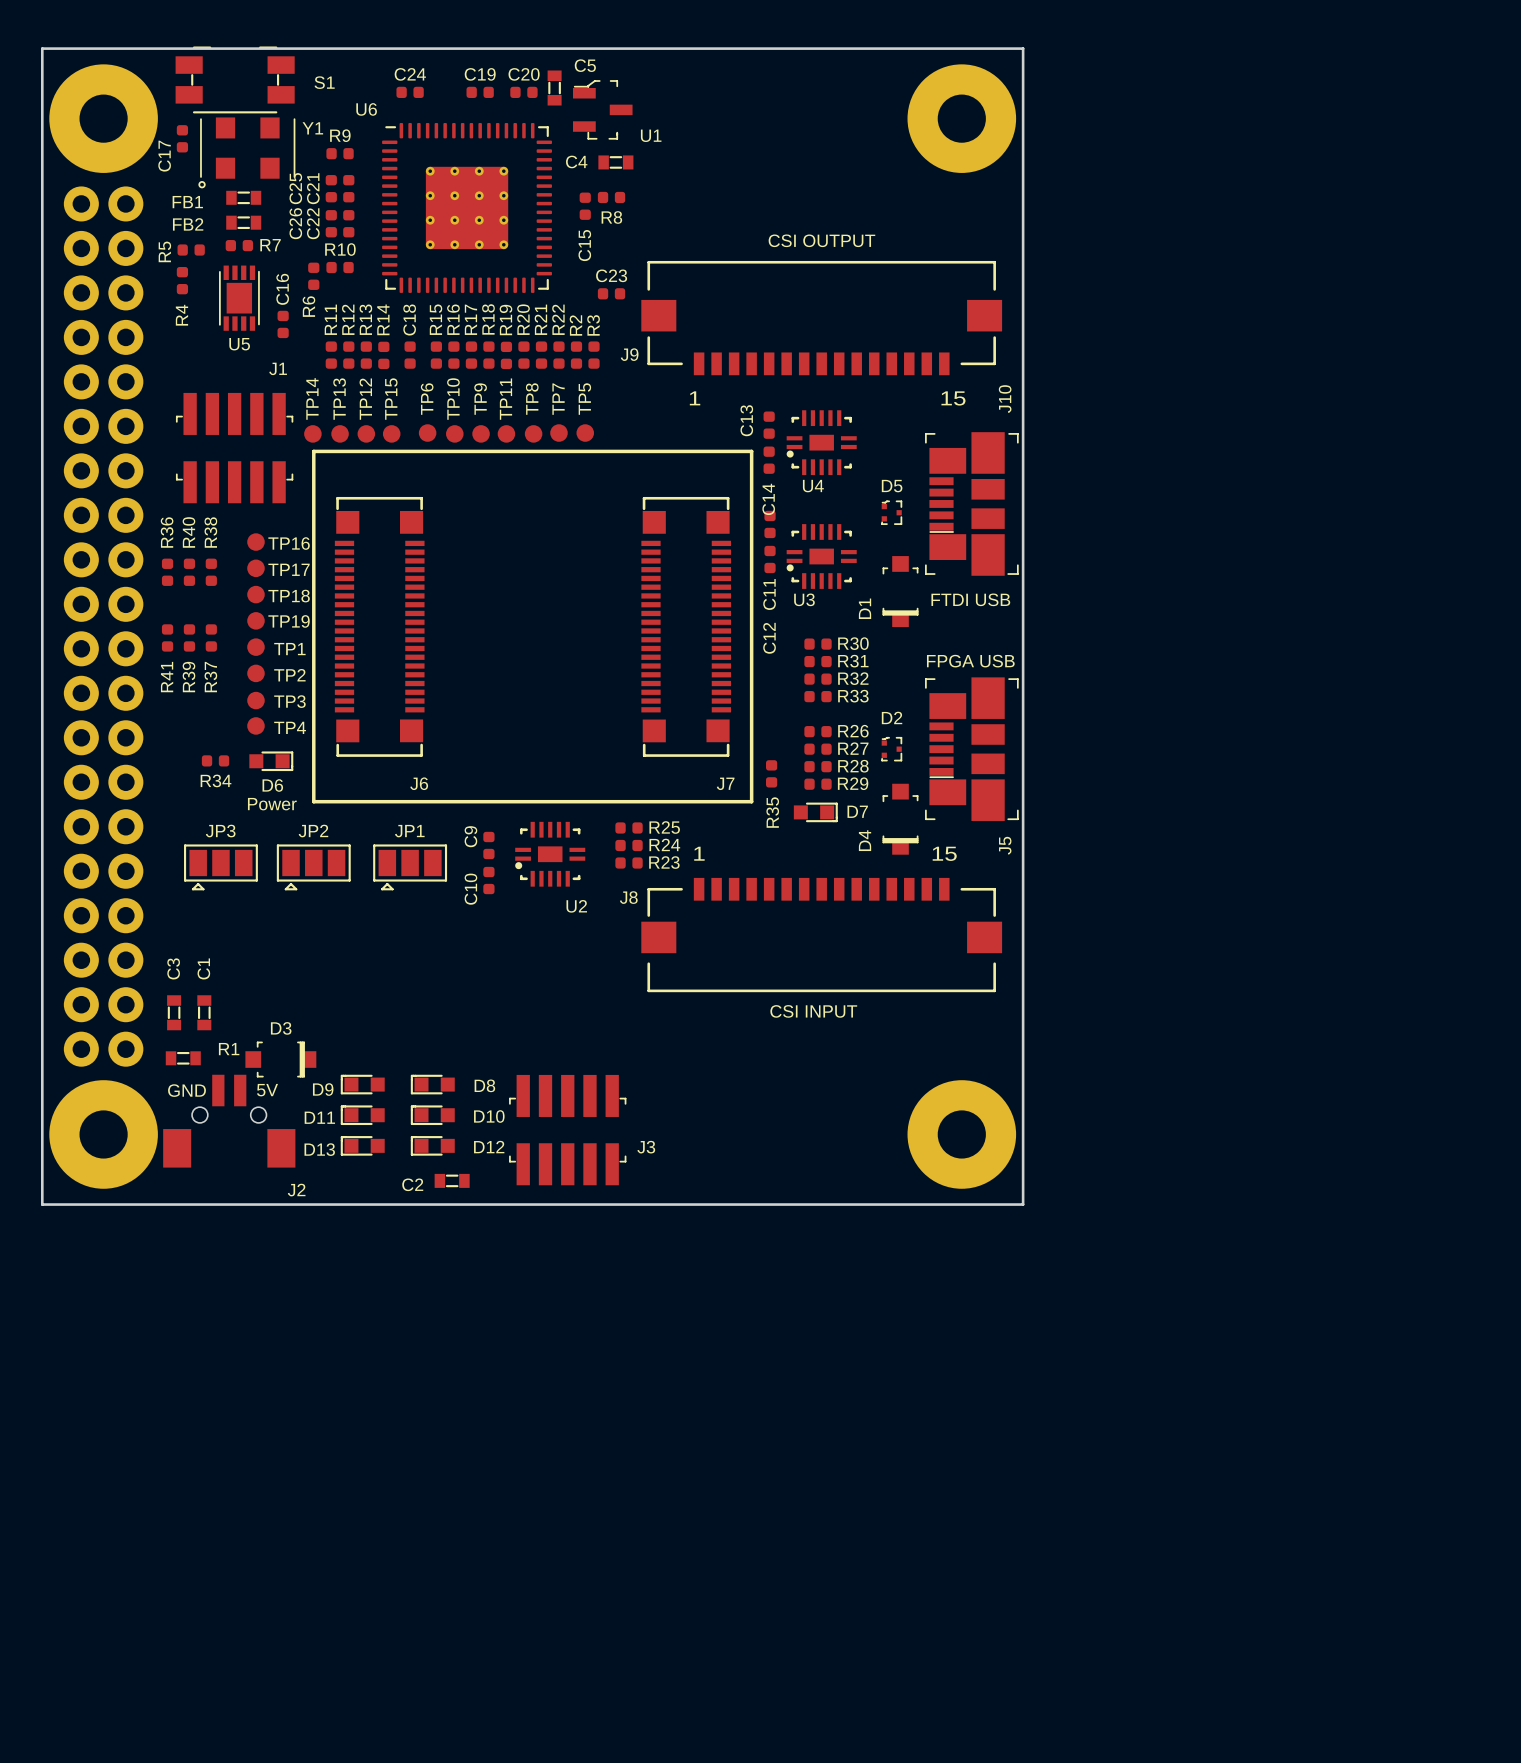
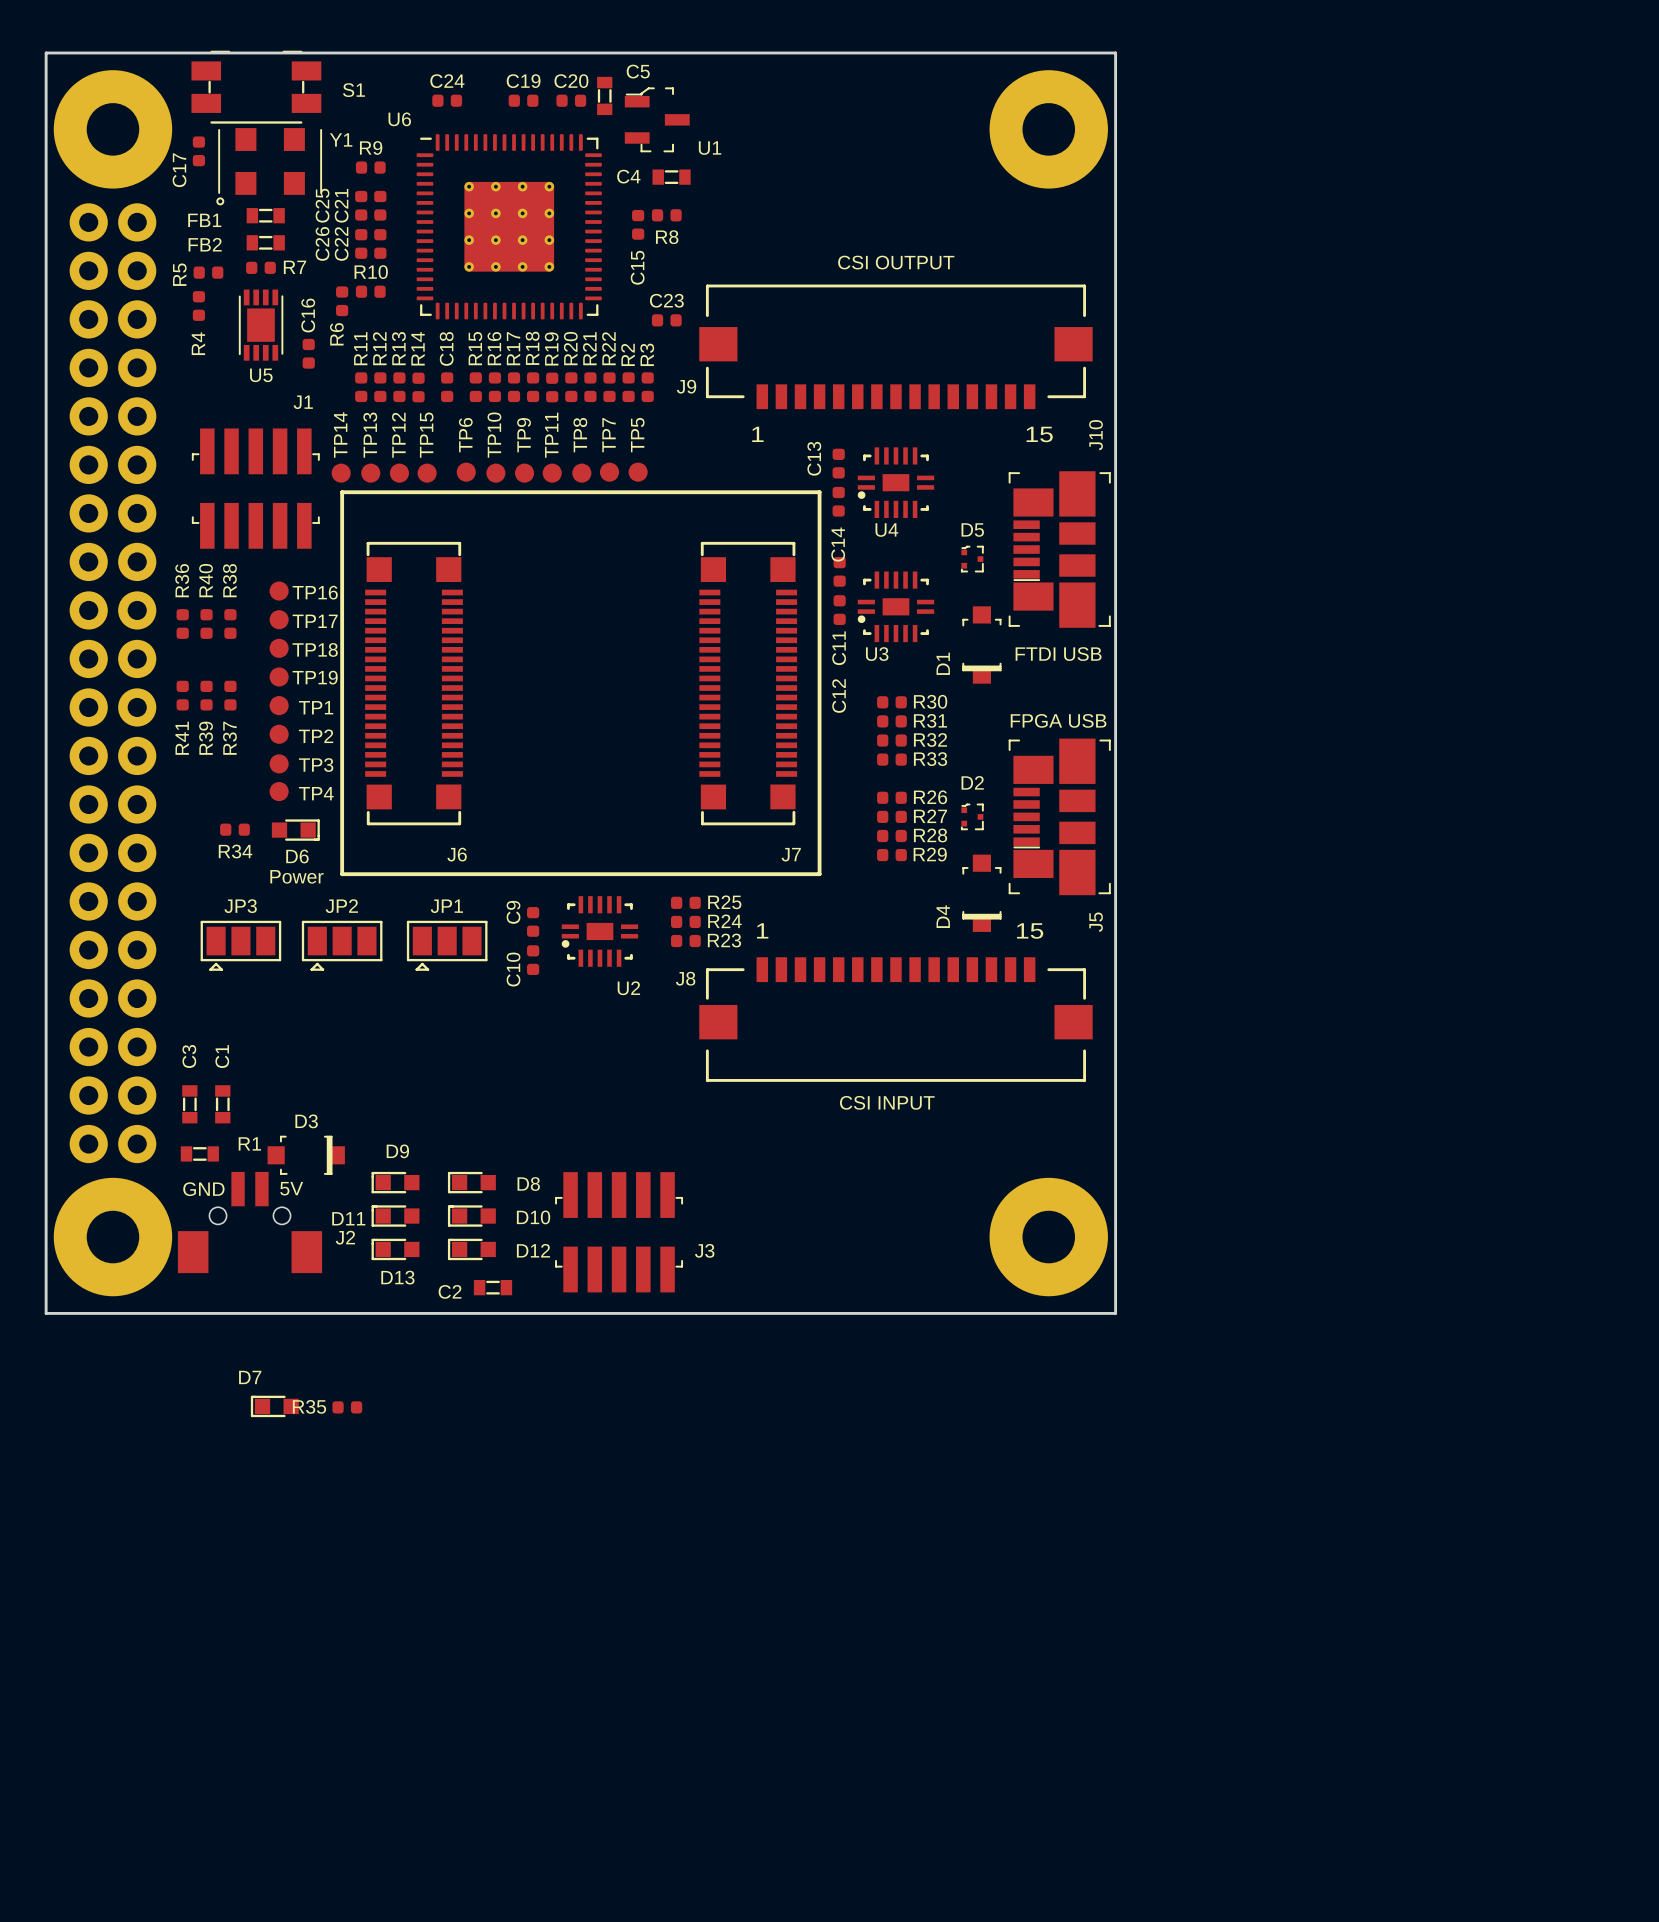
R35 rotation: 0° (771, 773) -> 90° clockwise (347, 1407)
R35 position: (771, 773) -> (347, 1407)
D7 rotation: 0° (815, 812) -> 180° (274, 1406)
D7 position: (815, 812) -> (274, 1406)
D9 name position: D9 (323, 1089) -> D9 (397, 1151)
D13 name position: D13 (319, 1149) -> D13 (397, 1277)
J2 name position: J2 (296, 1190) -> J2 (345, 1237)

